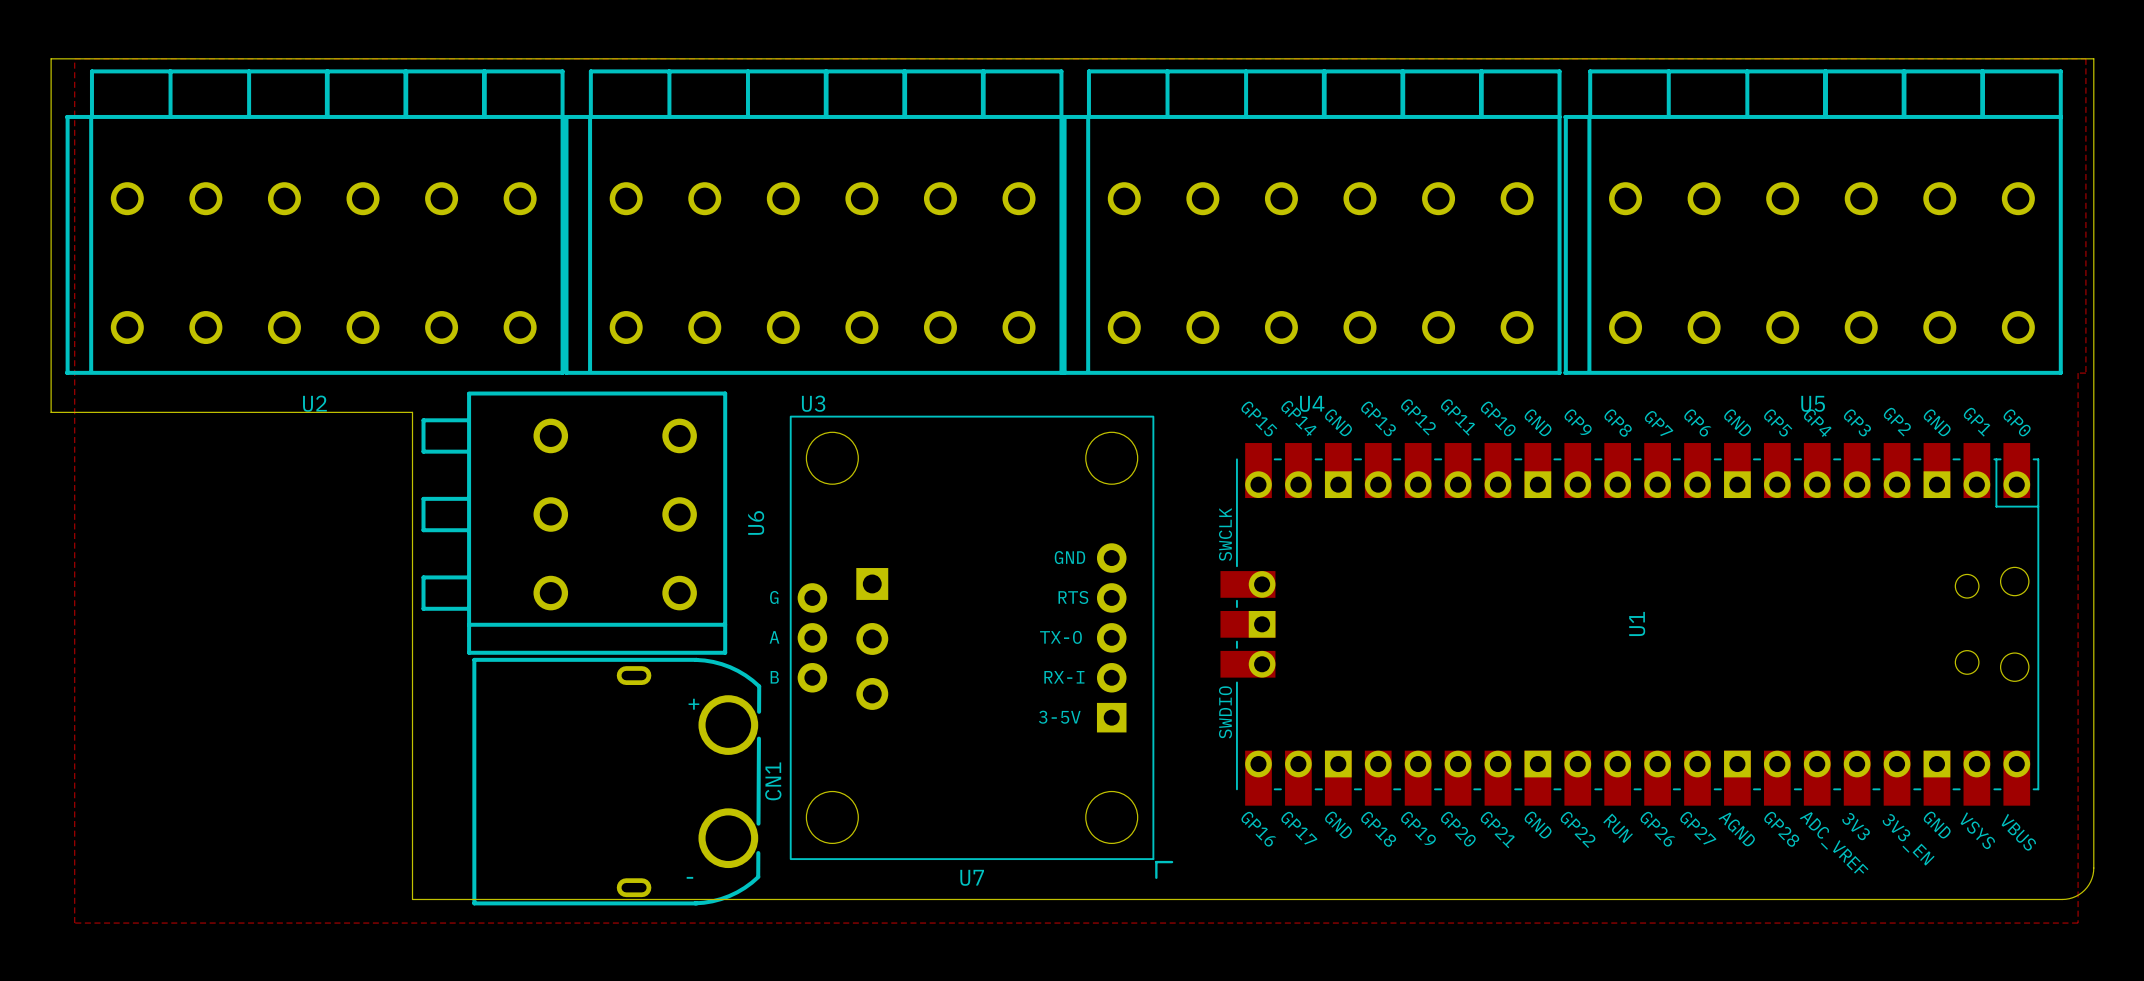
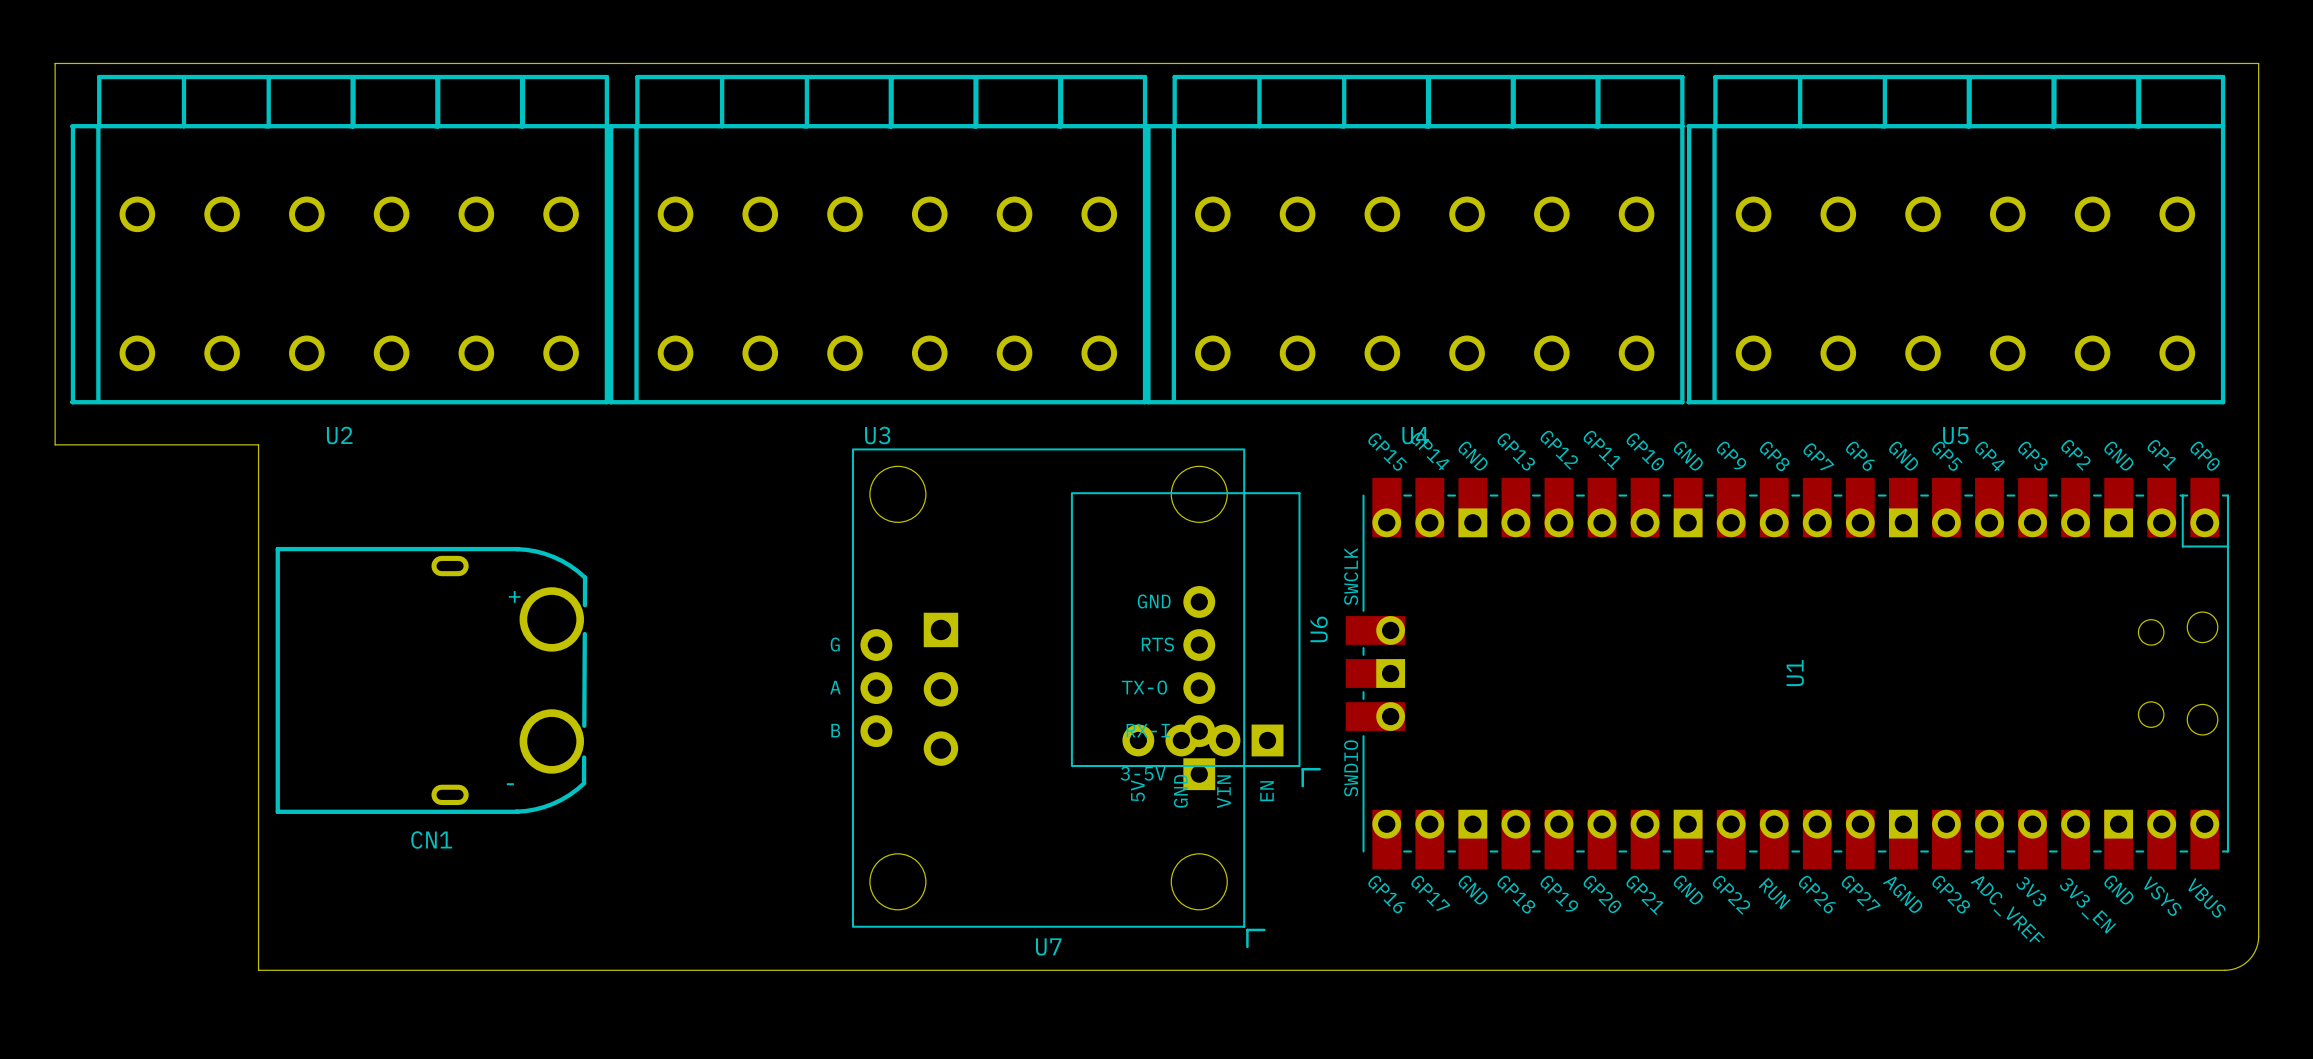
zone outline: (74, 58) (74, 923) (2078, 923) (2078, 373) (2085, 373) (2085, 58) (74, 58) -> none
U6 footprint: [421, 391, 728, 655] -> [1070, 492, 1321, 788]
board edge: (239, 412) (412, 412) (412, 899) -> (258, 444) (258, 970) (444, 970)
U6 name position: U6 (756, 522) -> U6 (1319, 629)
U1 position: (1629, 624) -> (1787, 673)
CN1 position: (616, 781) -> (431, 680)
CN1 name rotation: 0° (773, 781) -> 90° clockwise (431, 839)
CN1 name position: CN1 (773, 781) -> CN1 (431, 839)

